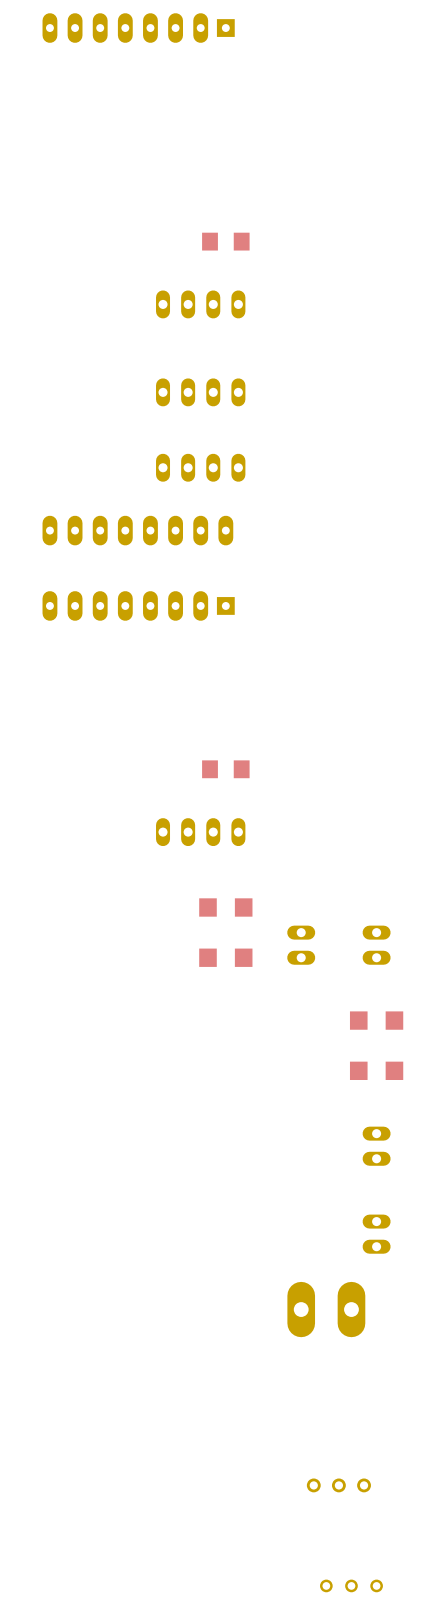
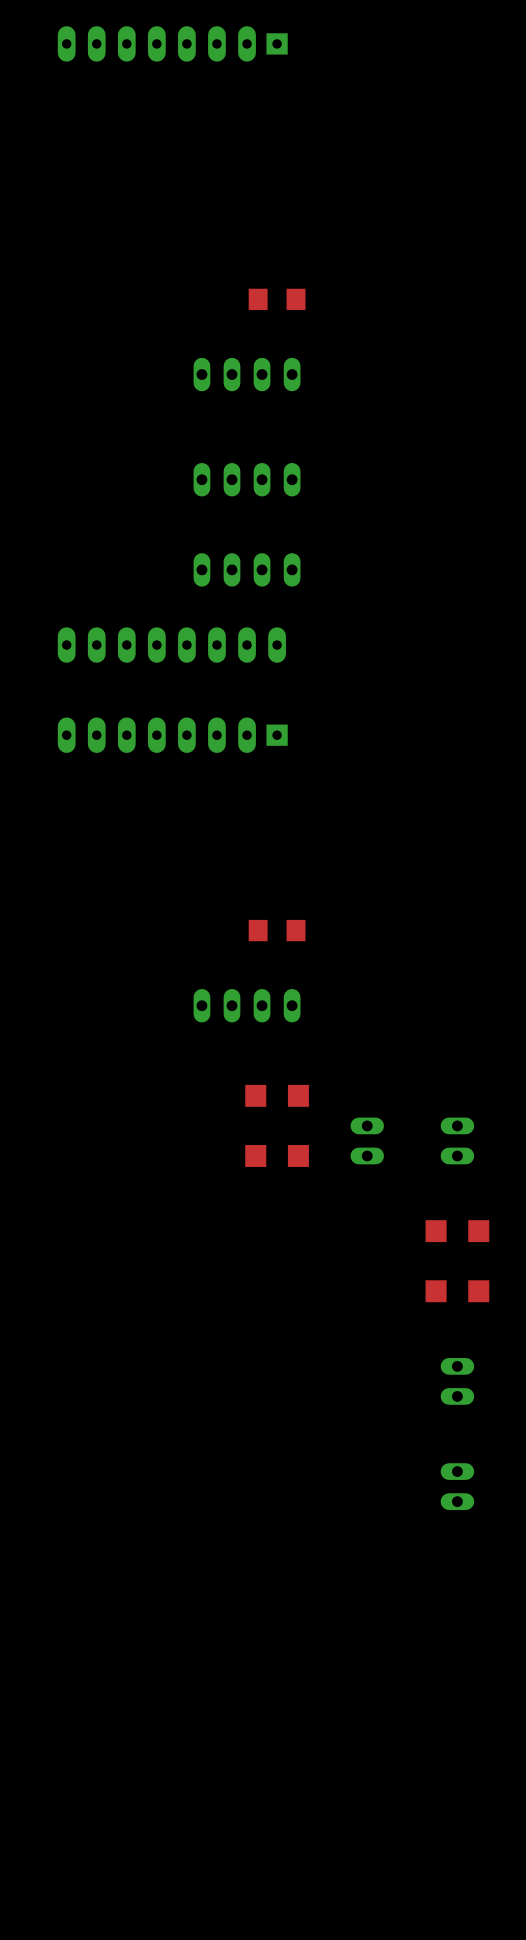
part: (326, 1309) -> none
part: (338, 1485) -> none
part: (351, 1585) -> none

